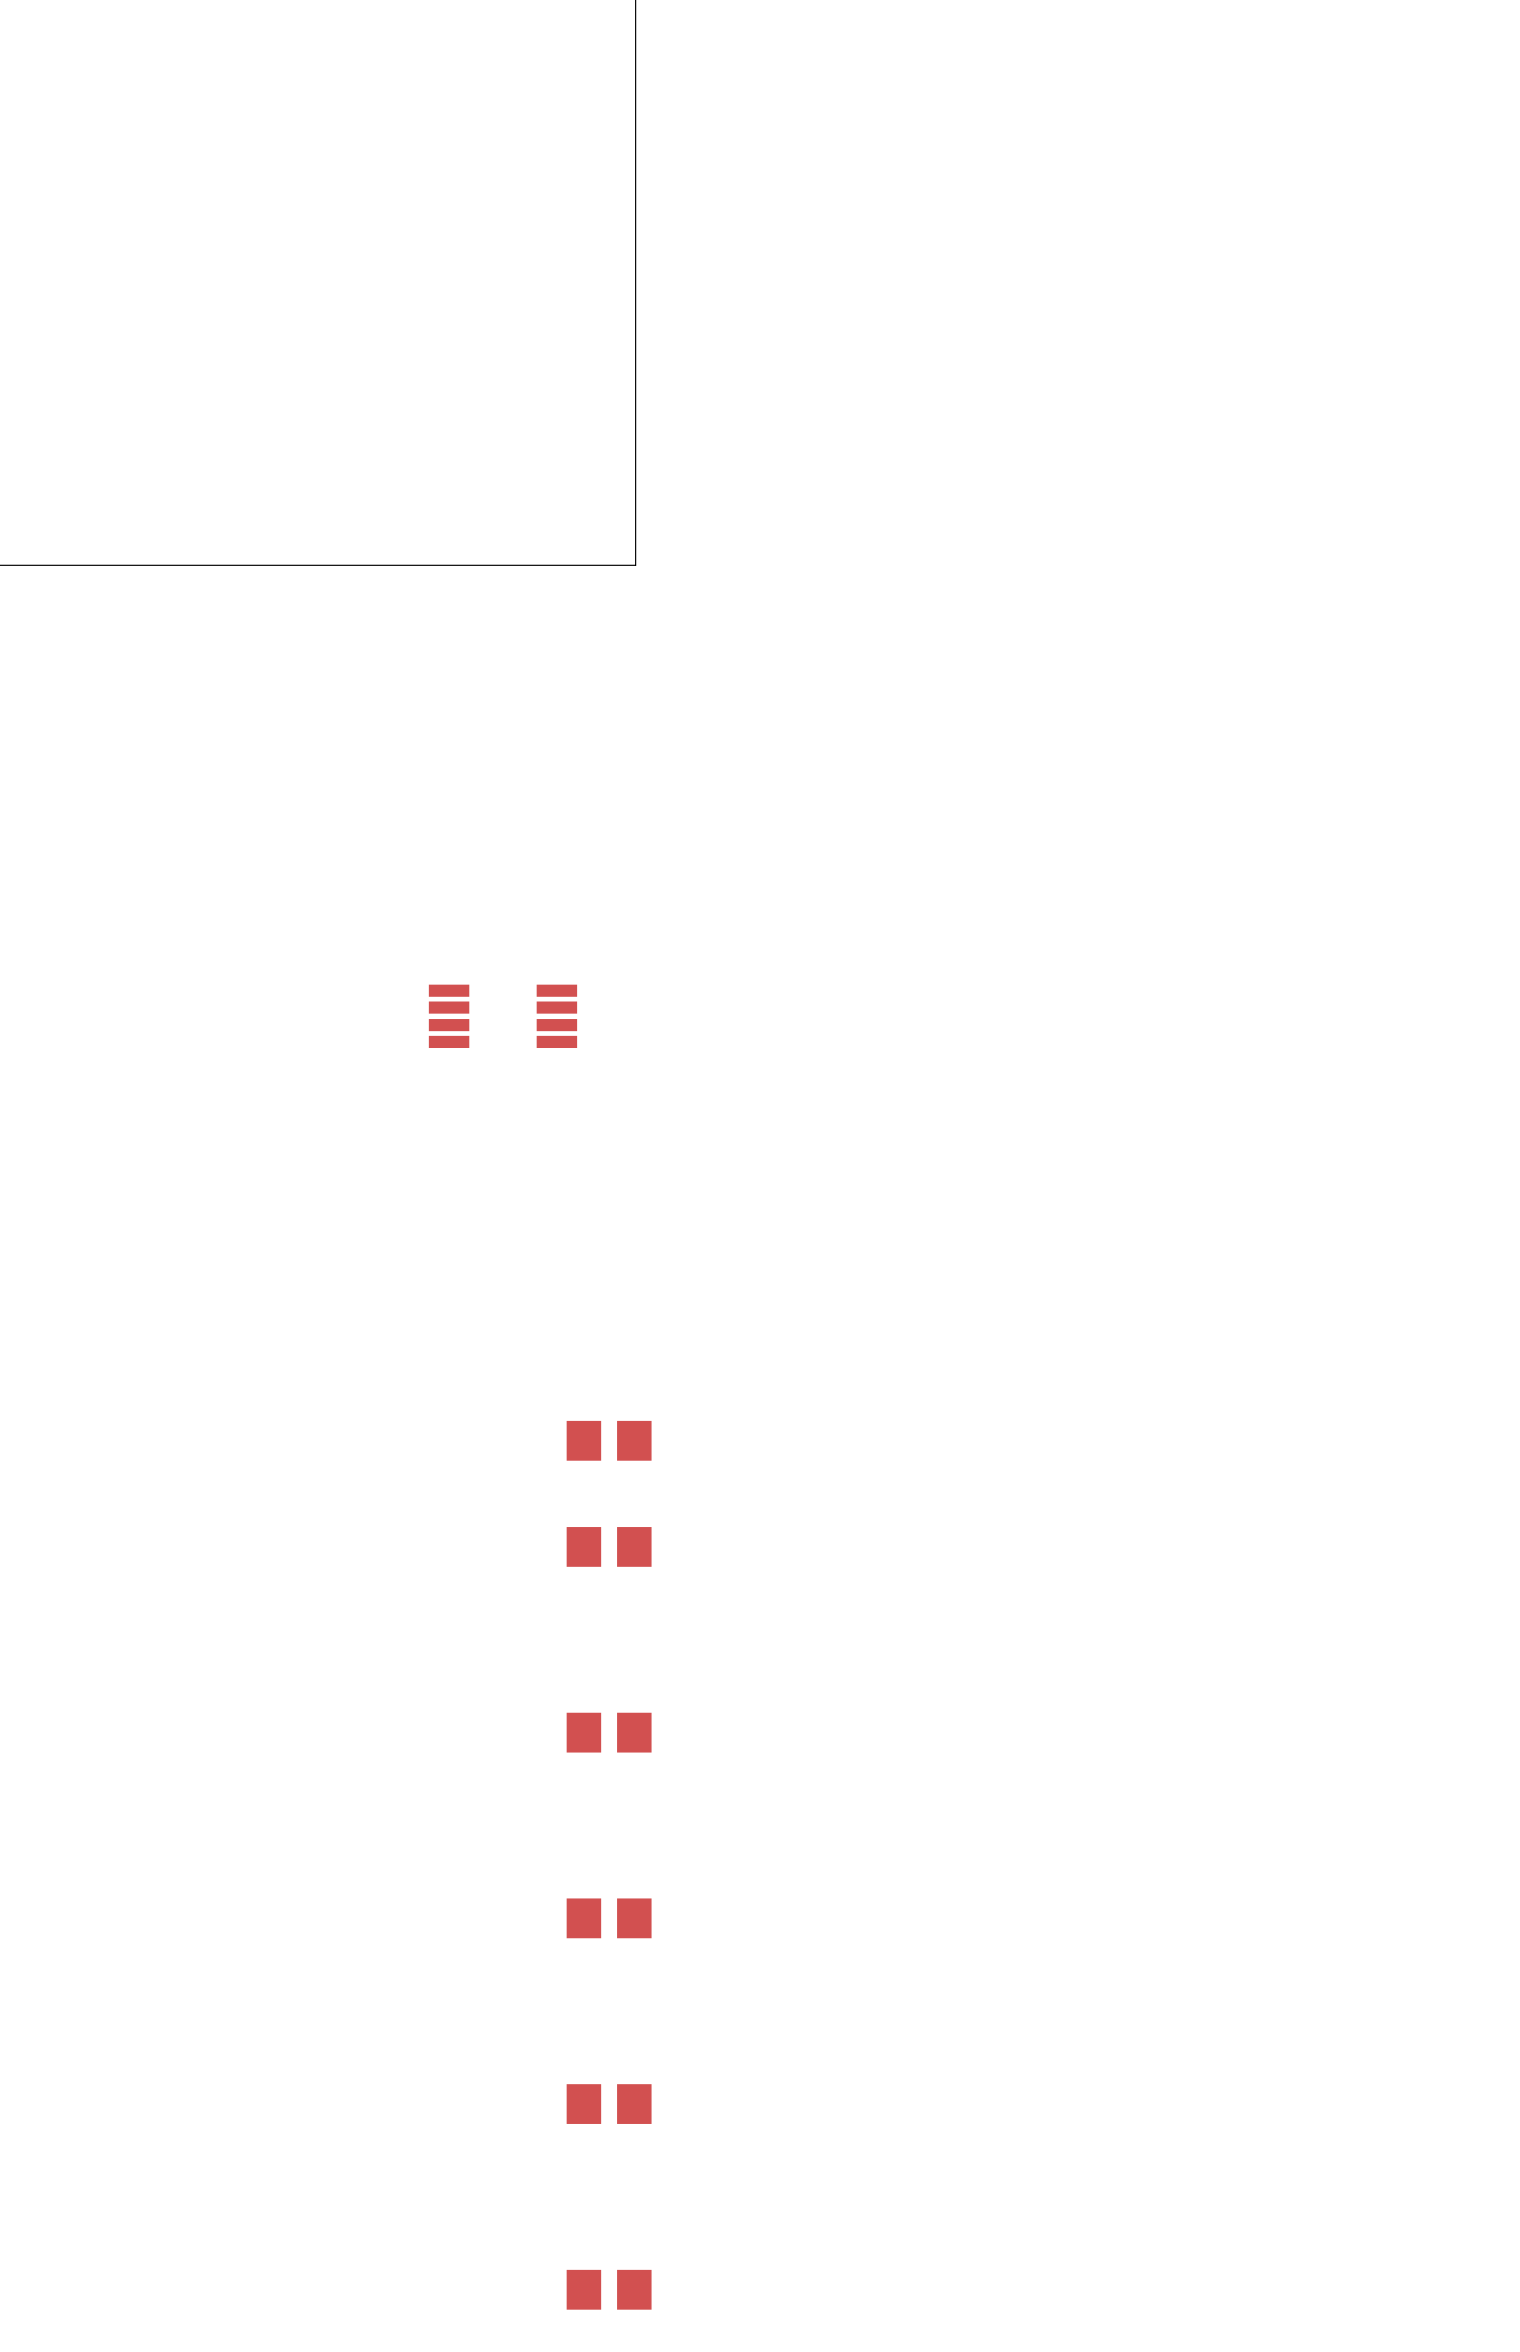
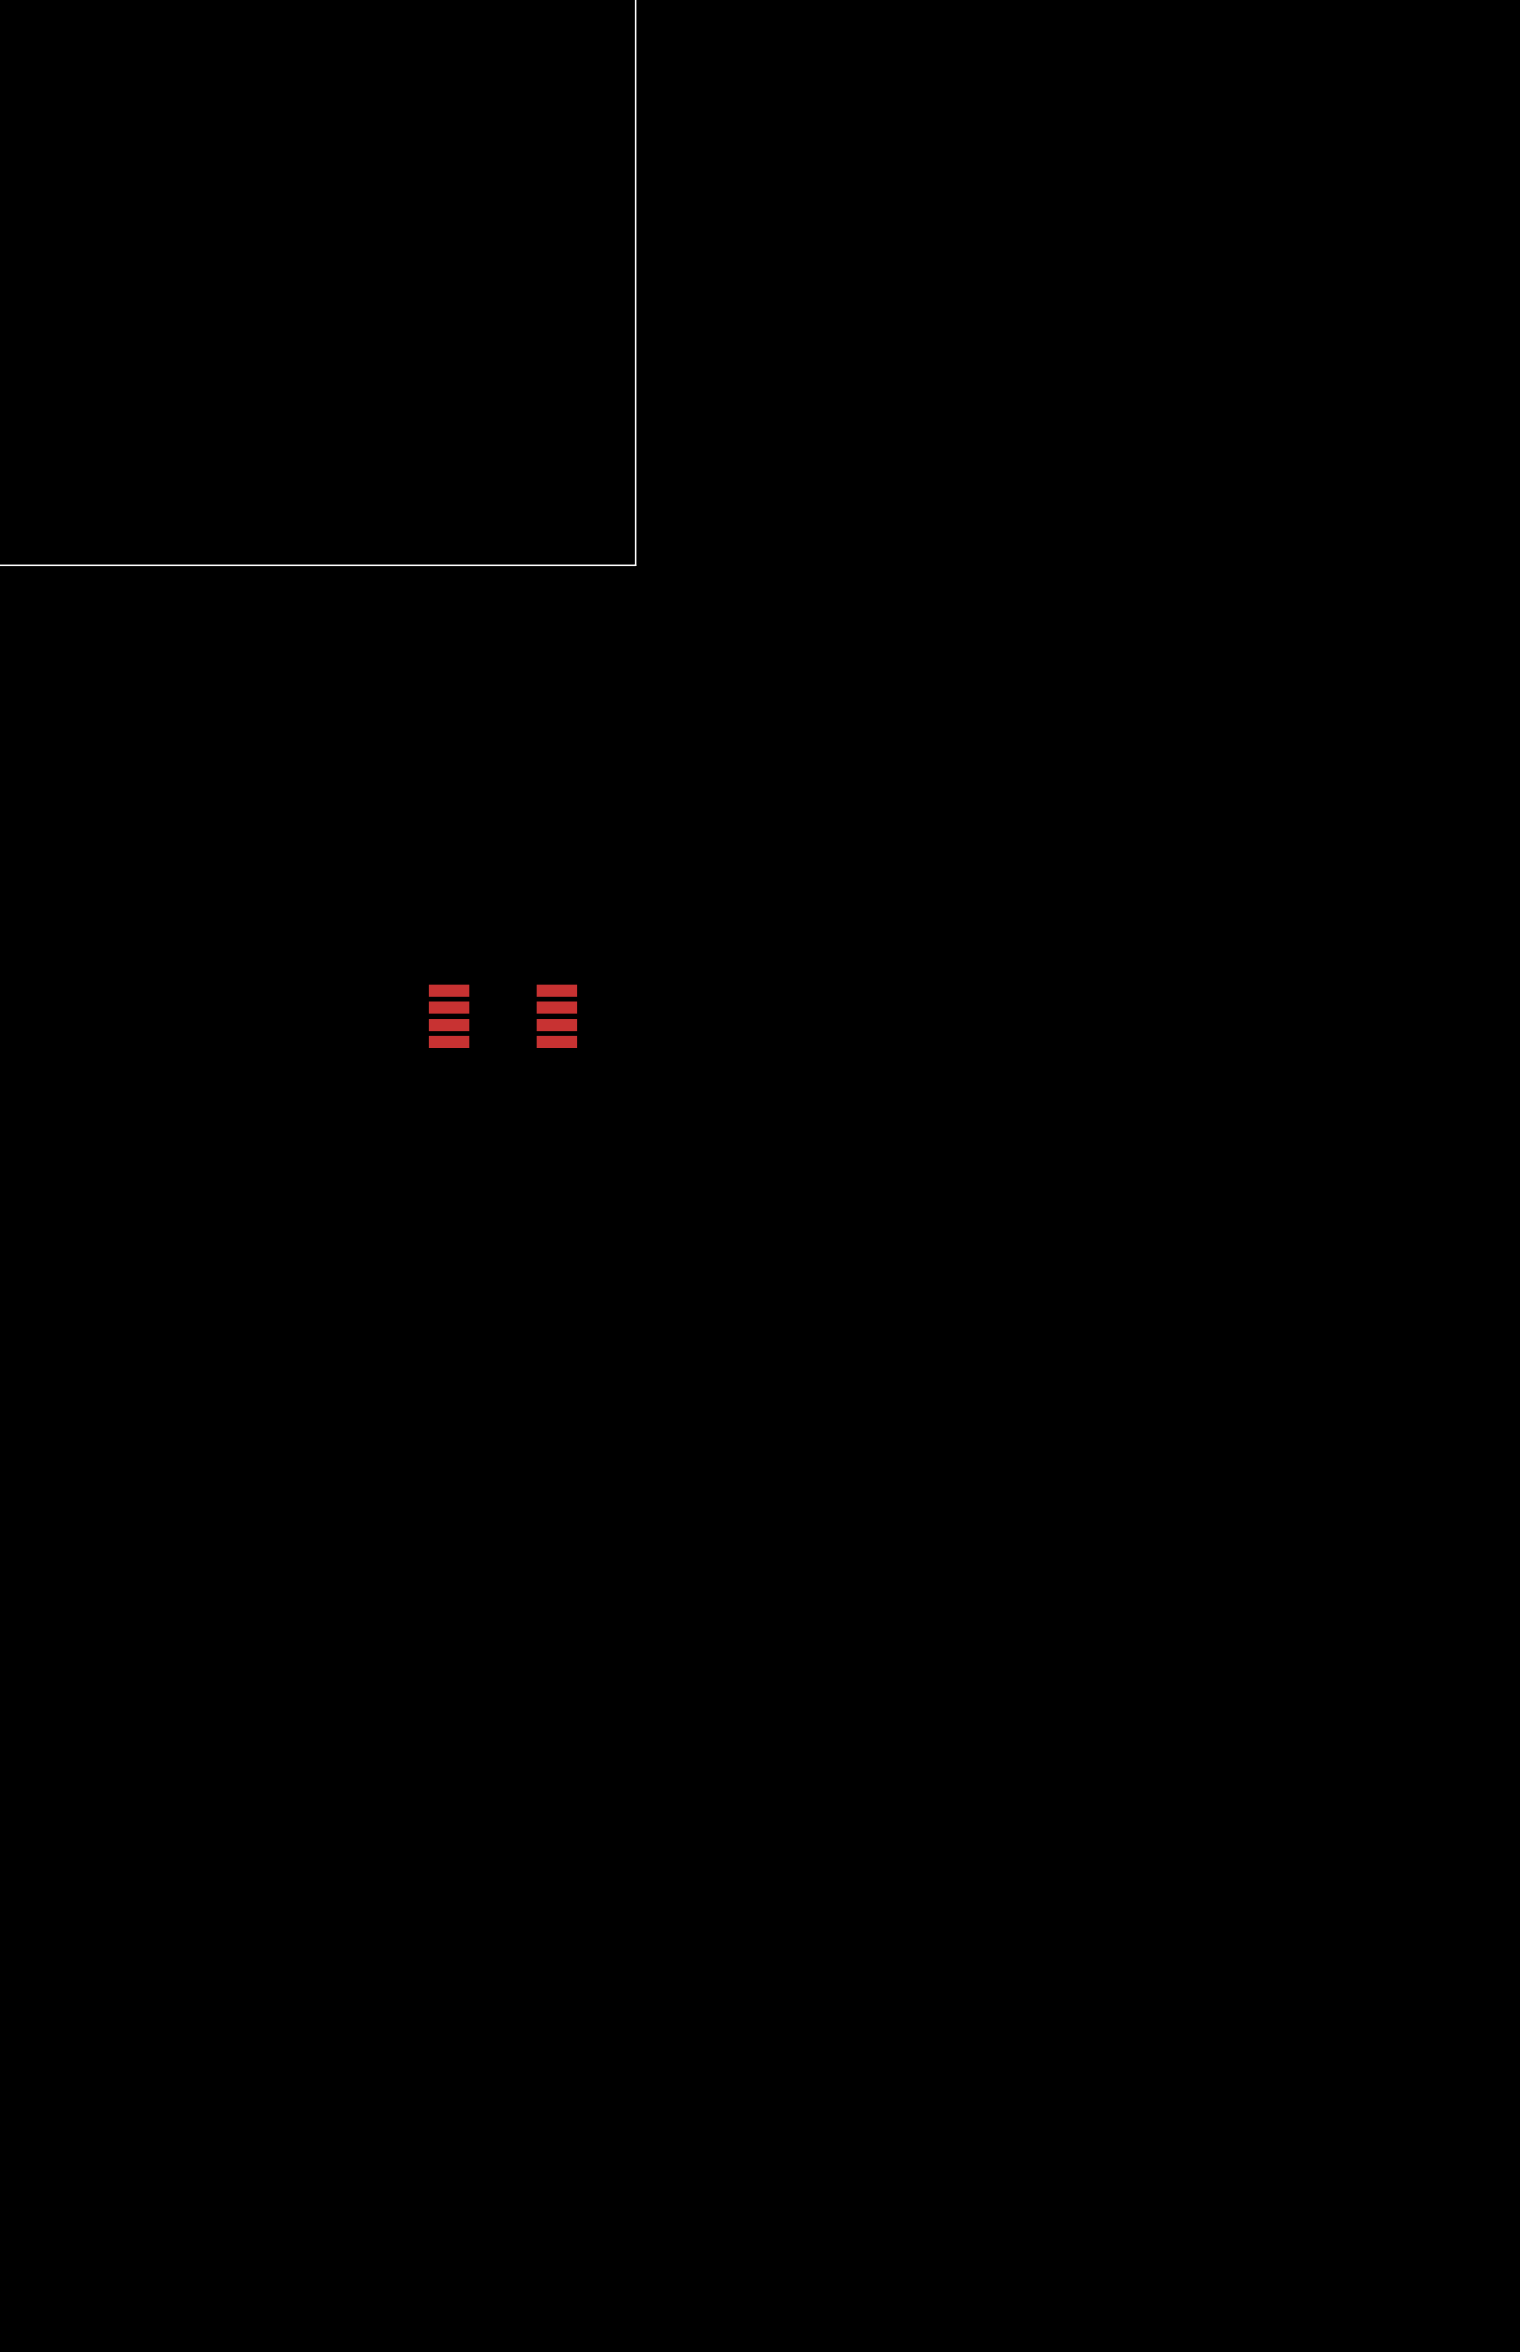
part: (609, 1440) -> none
part: (609, 1546) -> none
part: (609, 1732) -> none
part: (609, 1918) -> none
part: (609, 2104) -> none
part: (609, 2289) -> none

